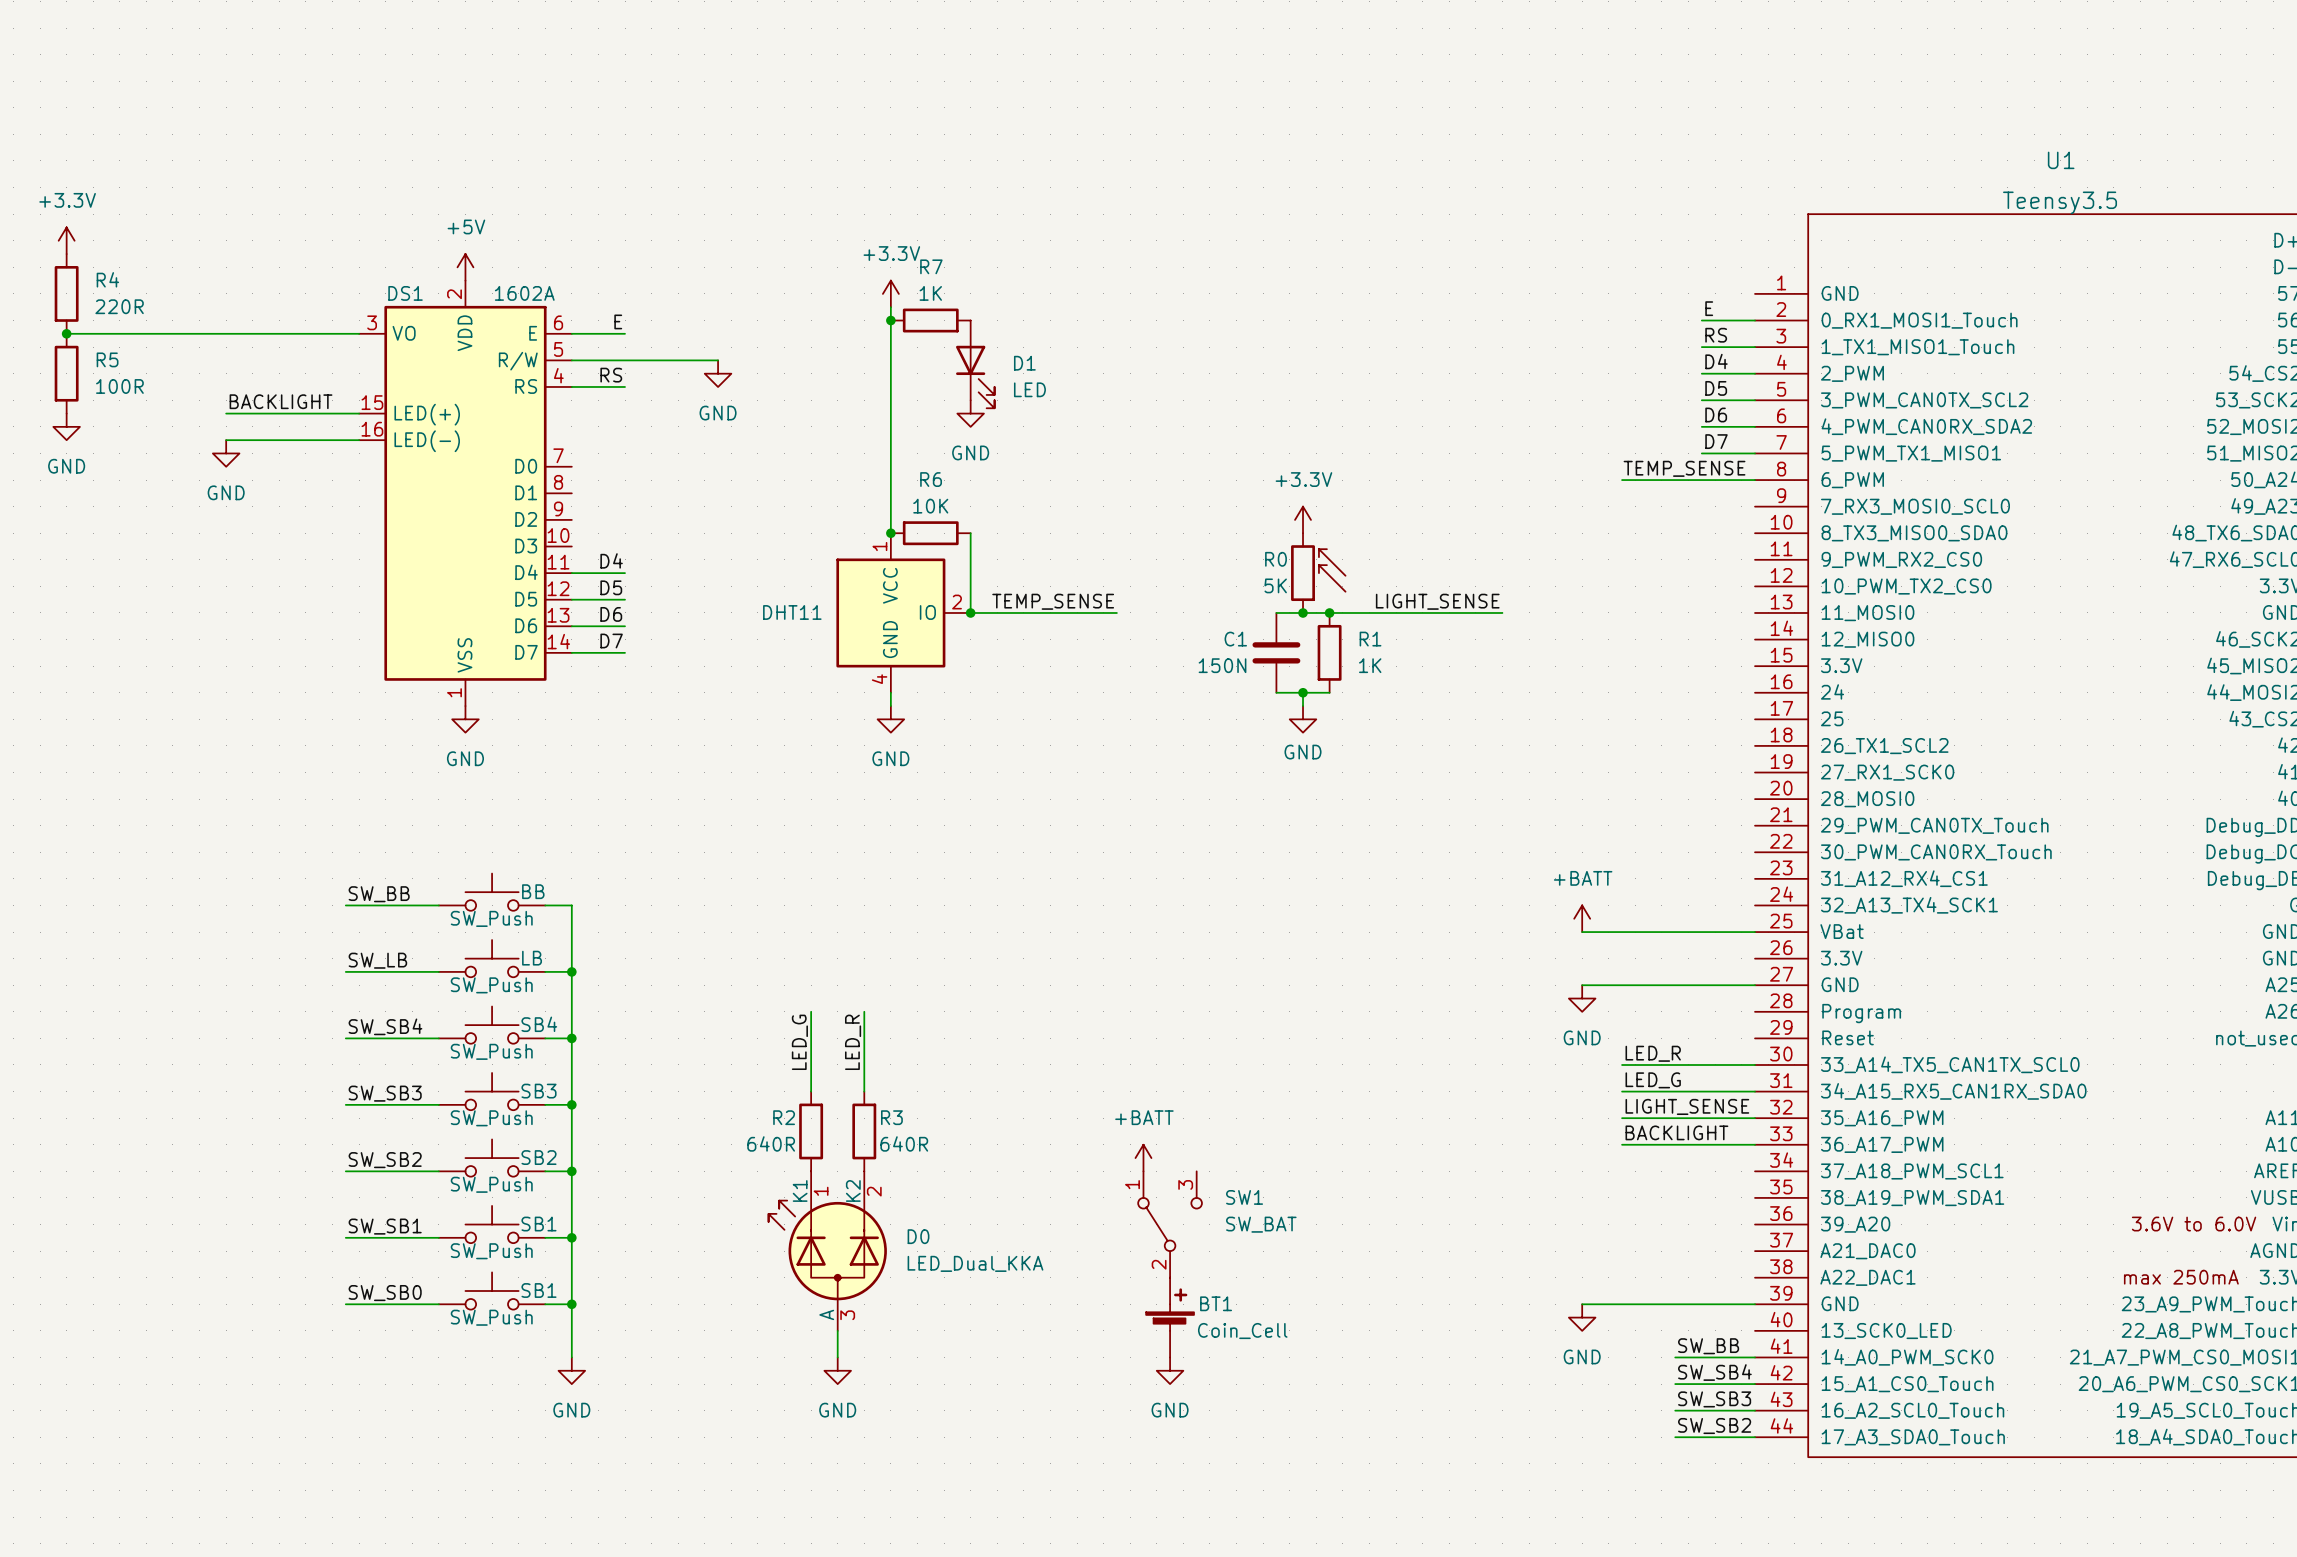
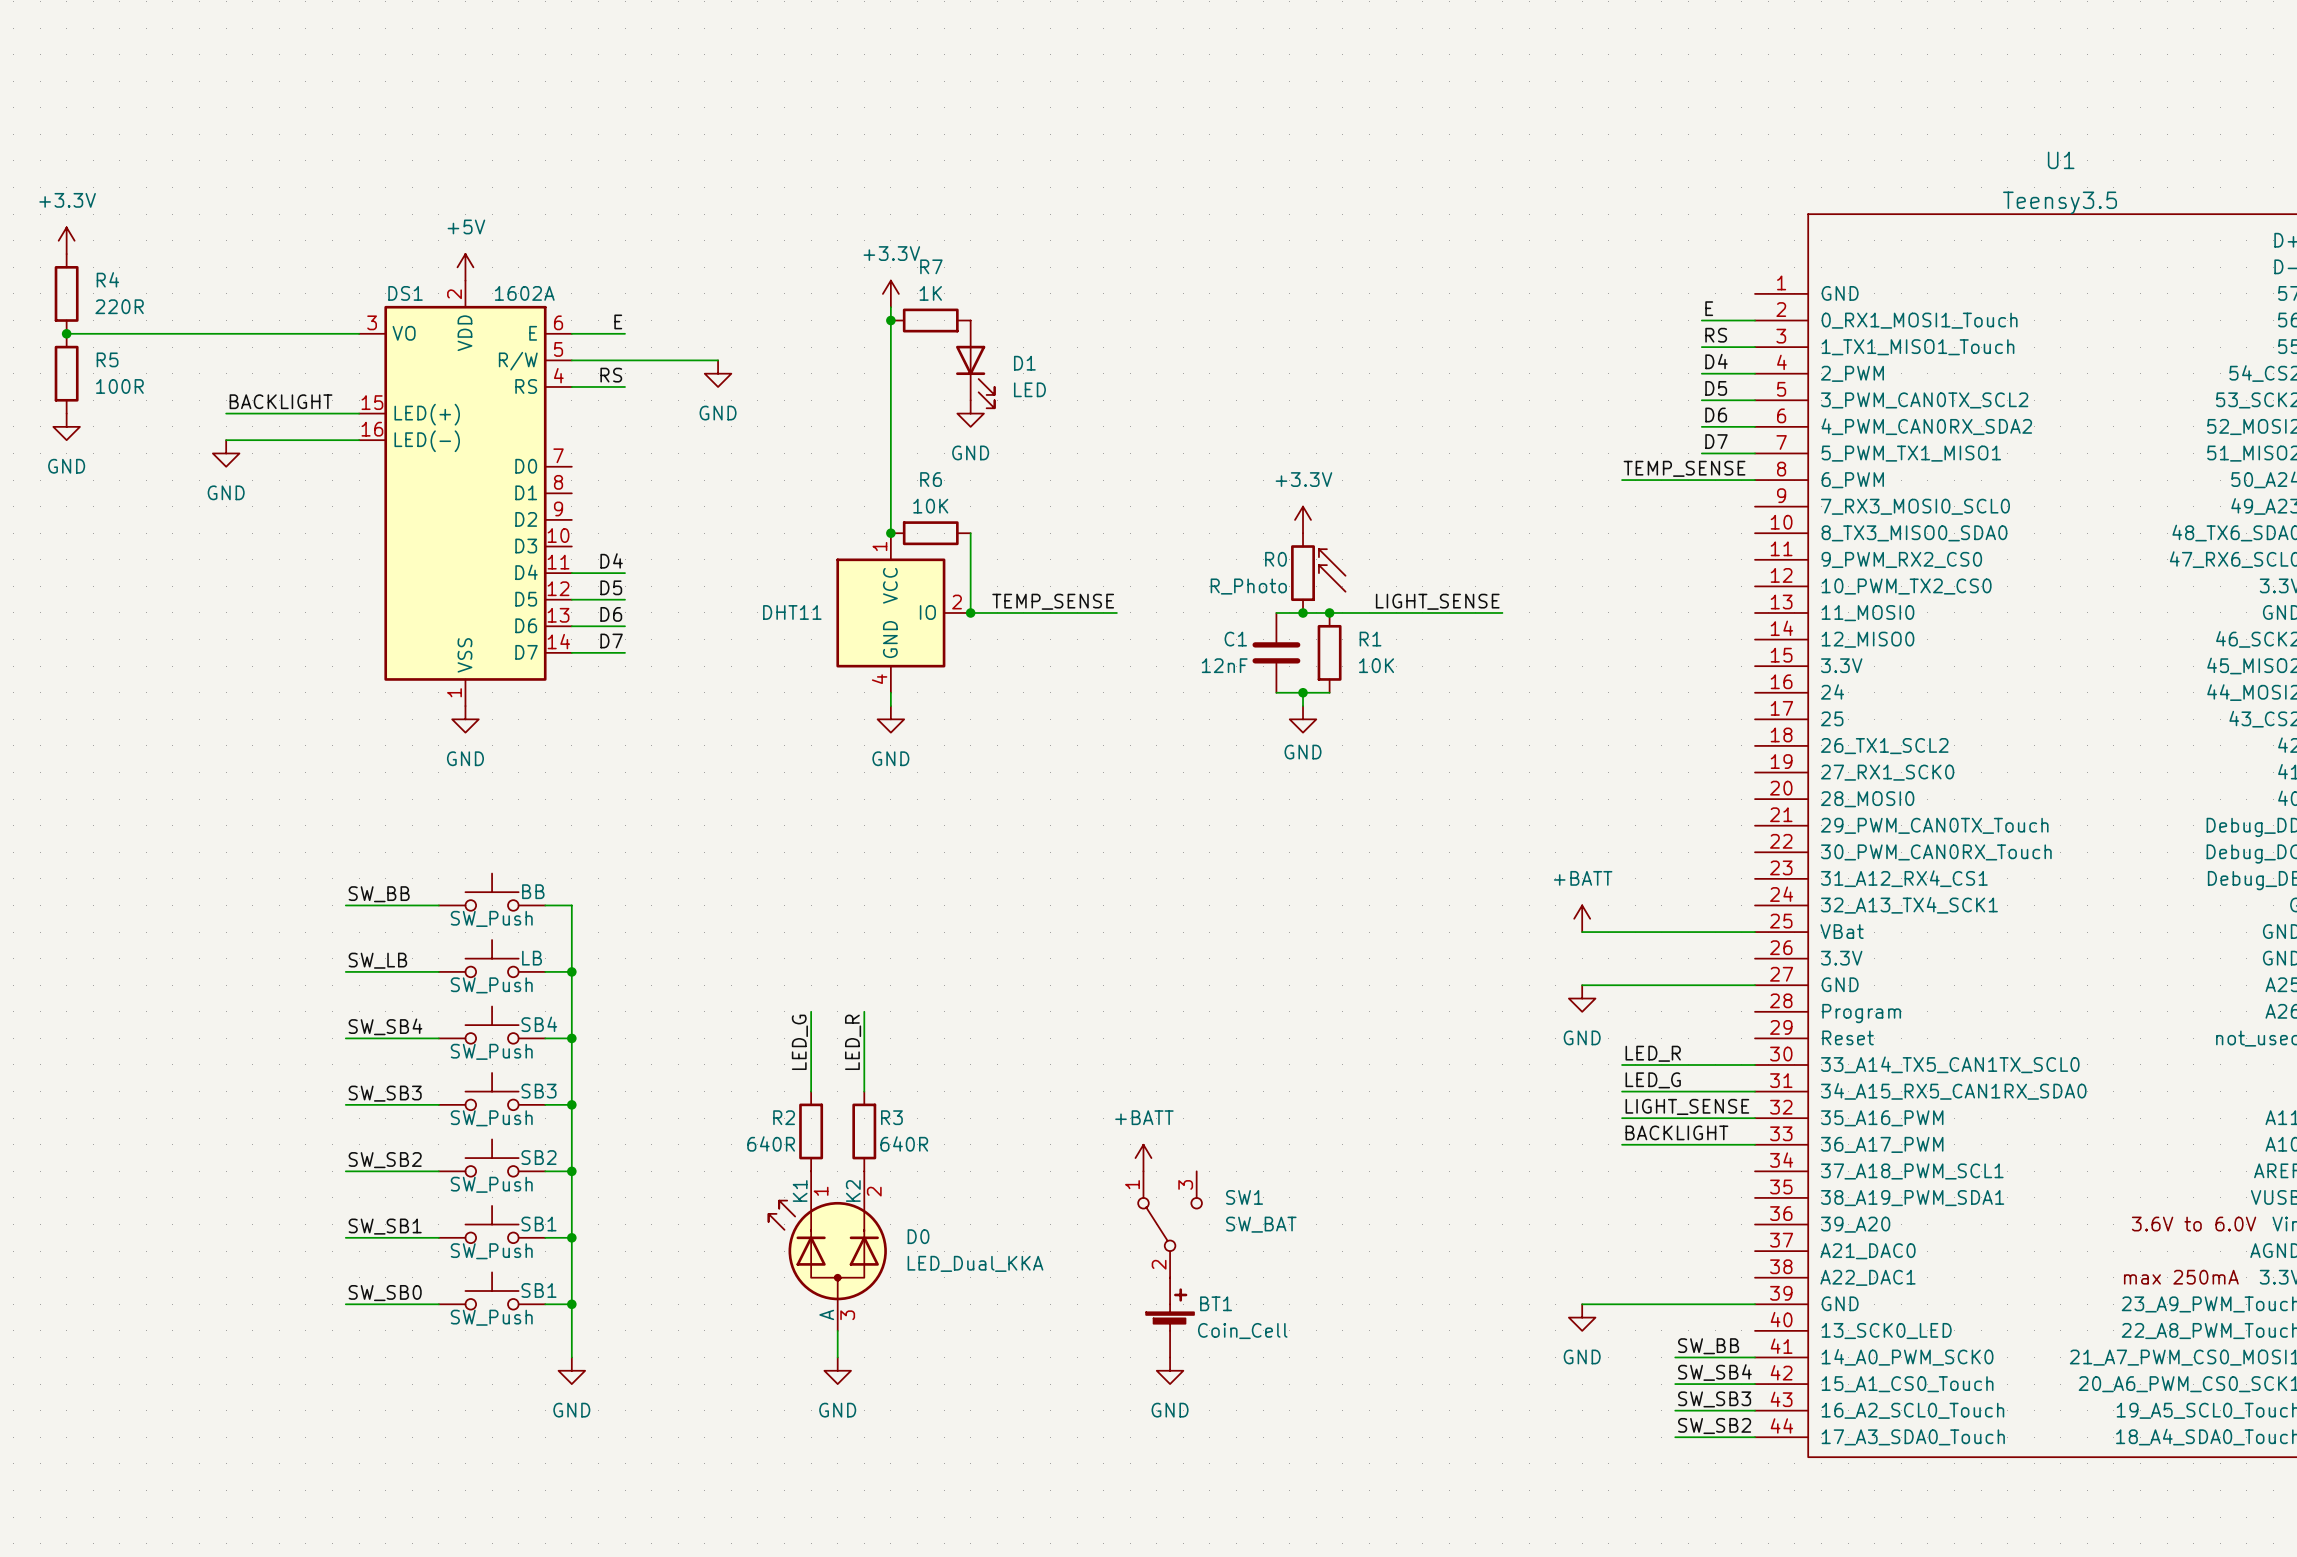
R0 value: 5K (1275, 585) -> R_Photo (1248, 586)
C1 value: 150N (1222, 665) -> 12nF (1224, 665)
R1 value: 1K (1370, 665) -> 10K (1376, 665)

